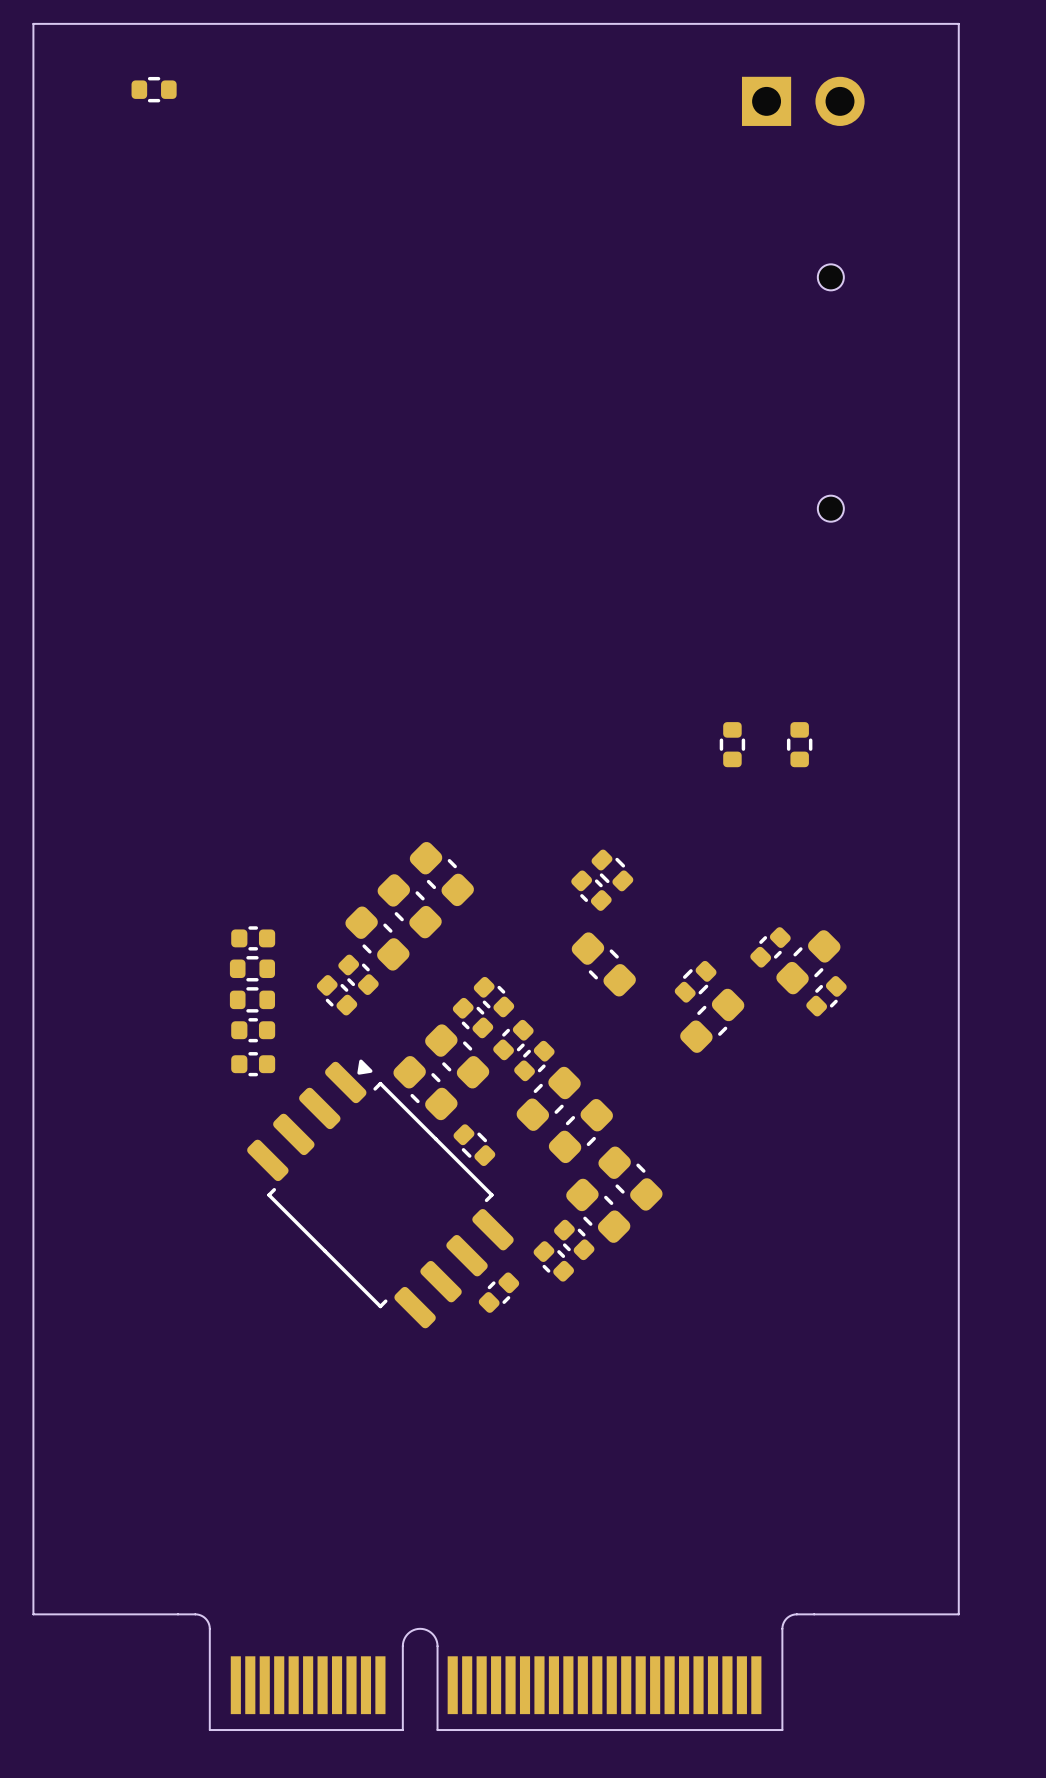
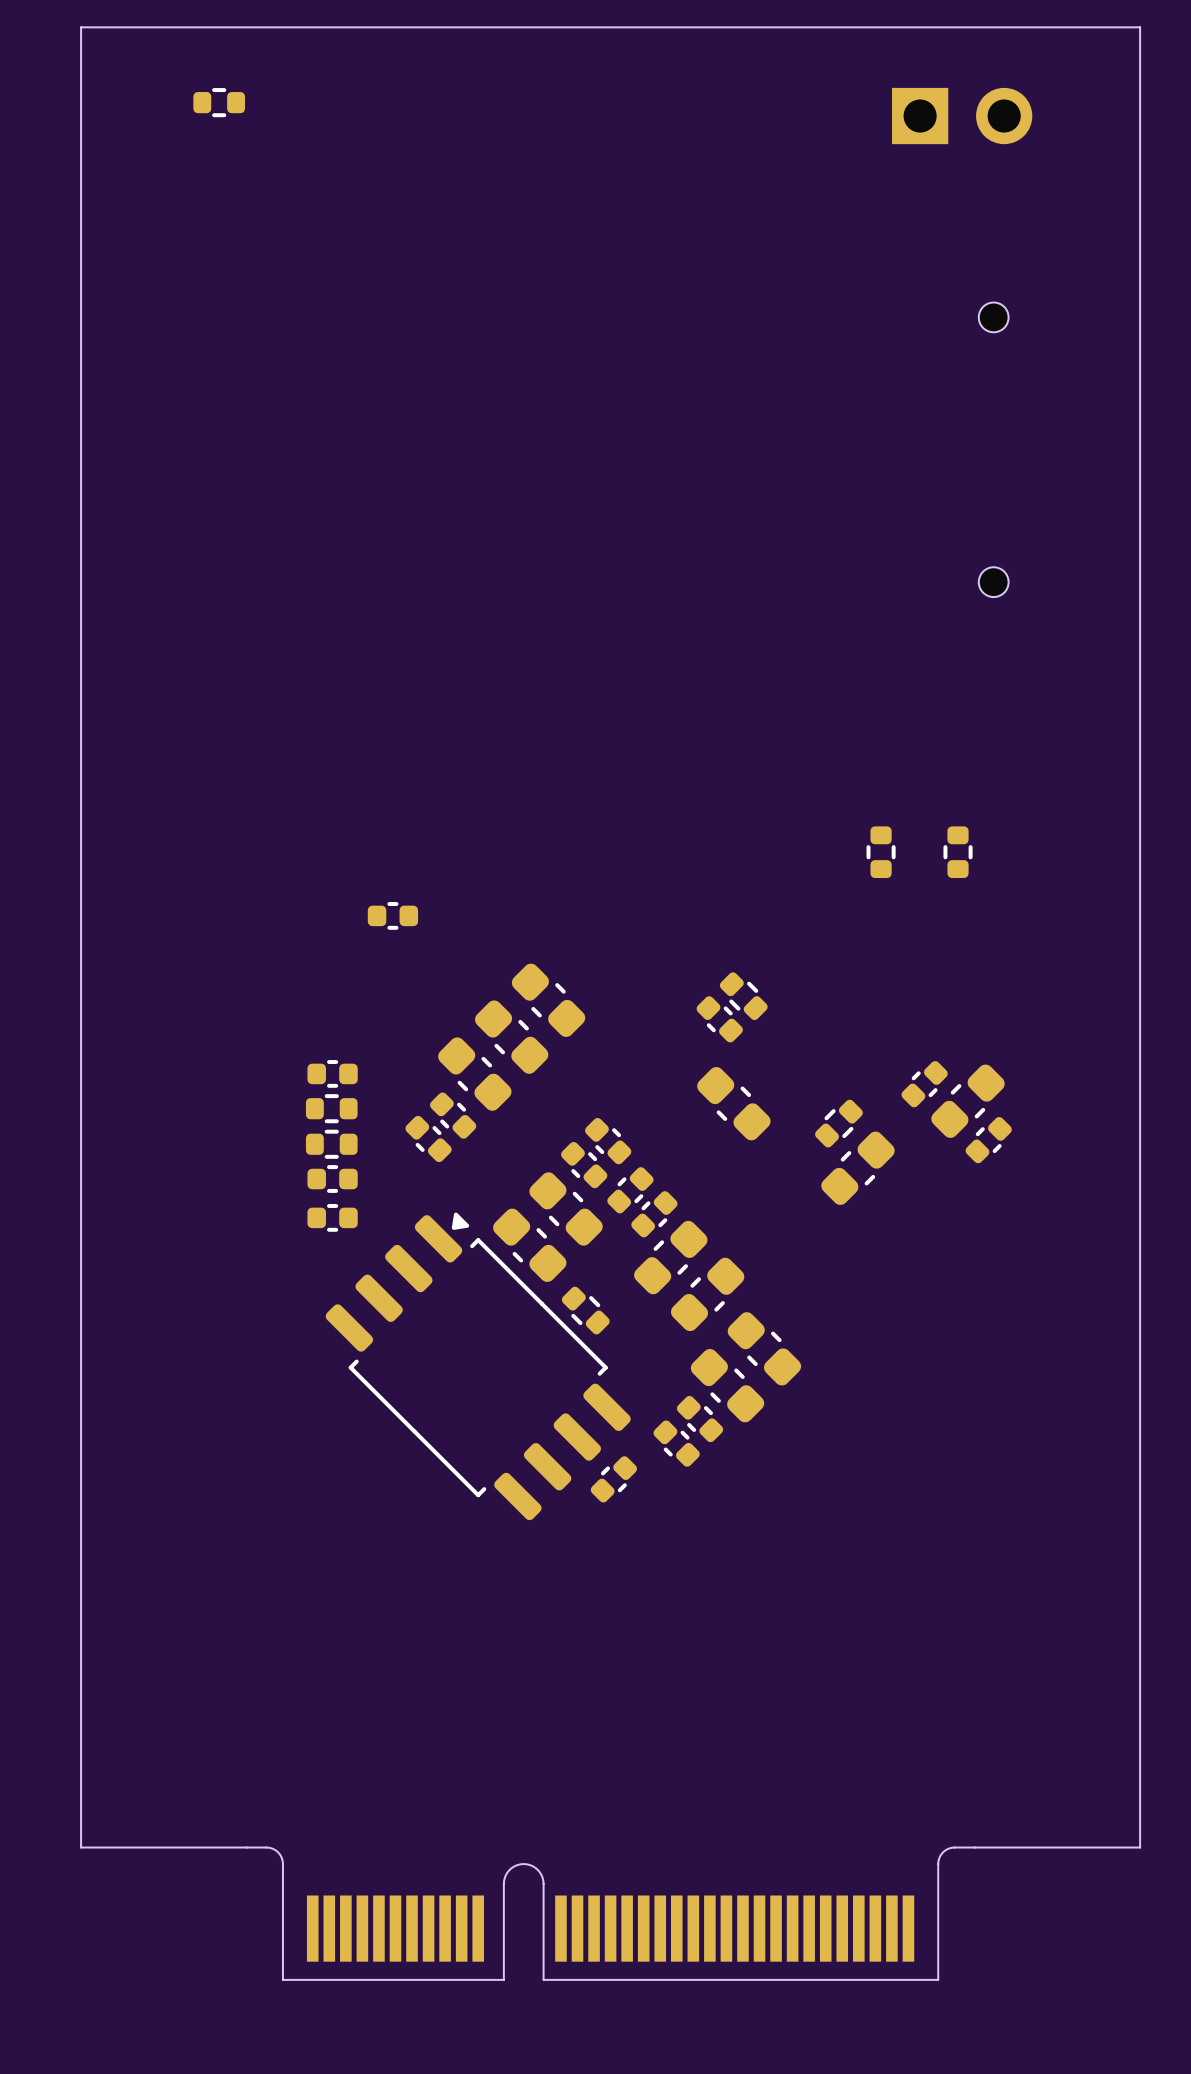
part: none -> (392, 915)

